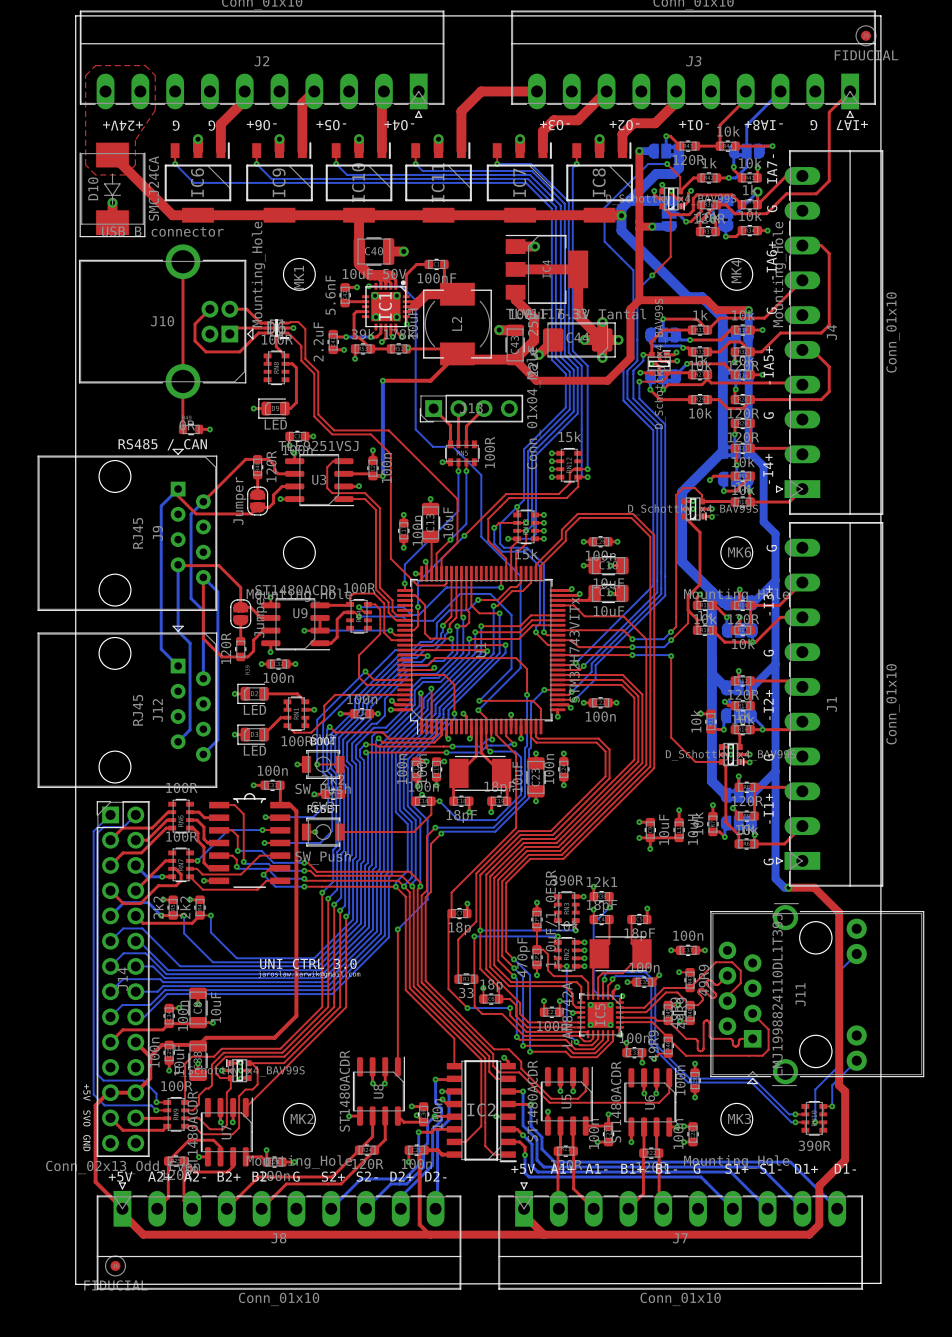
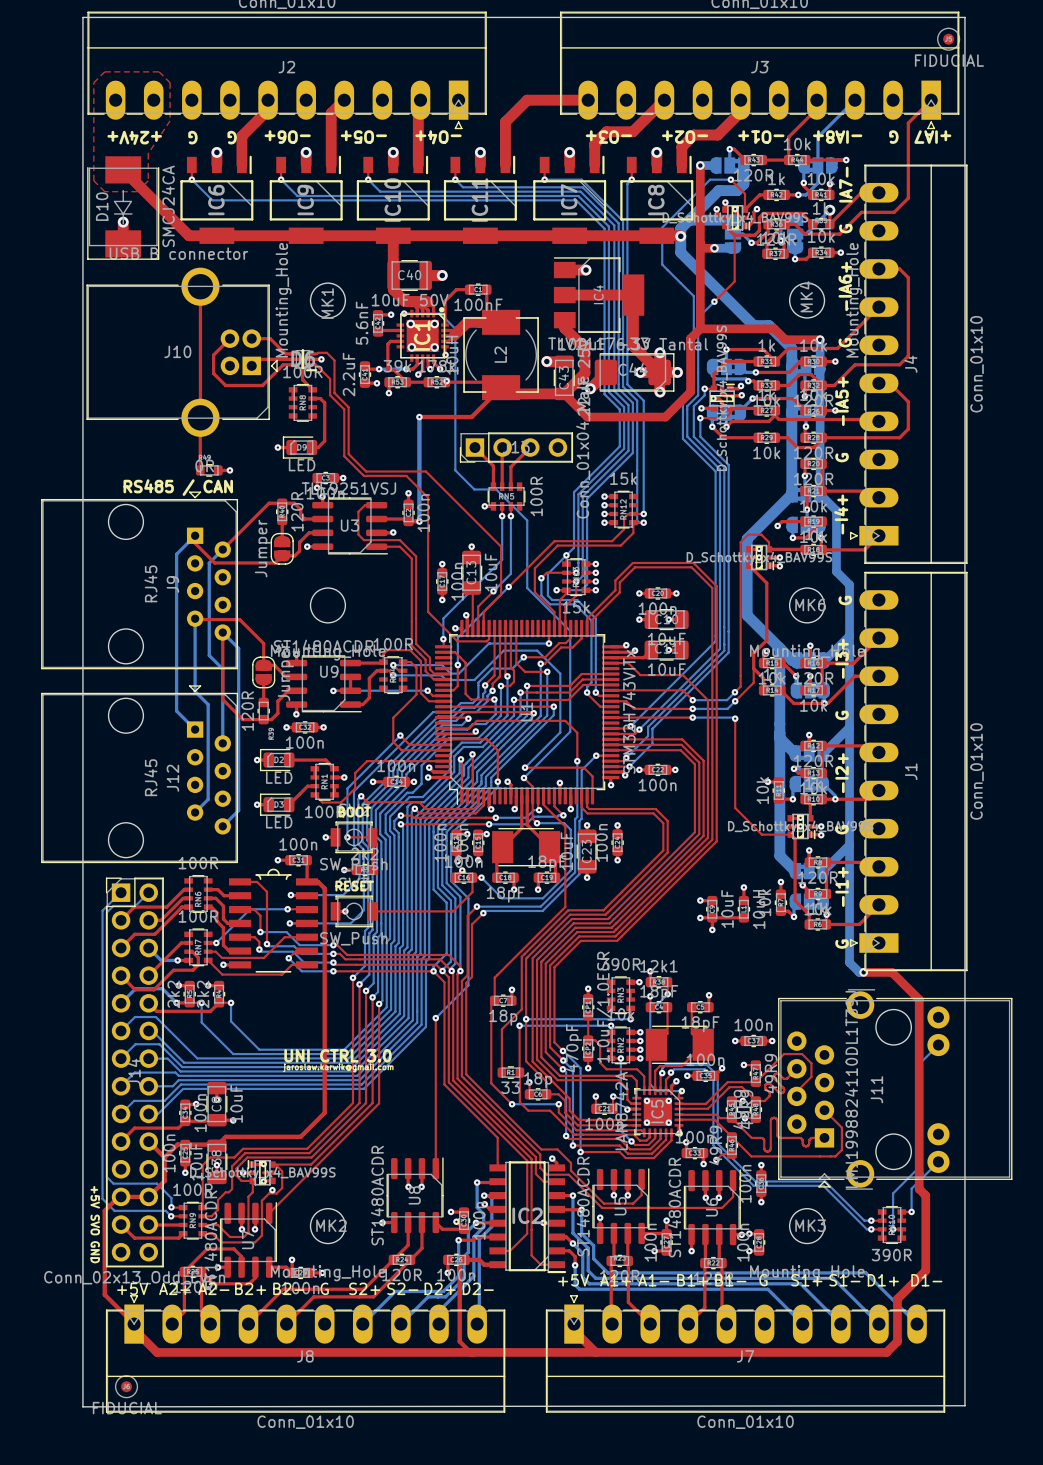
via position: (240, 1070) -> (272, 1190)

